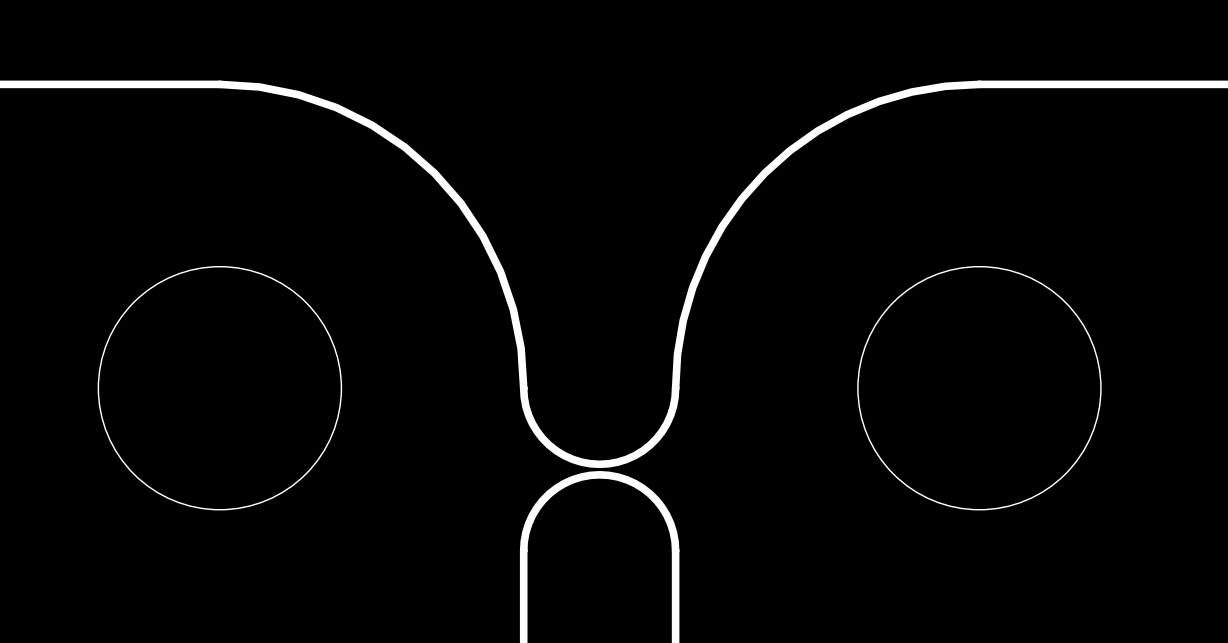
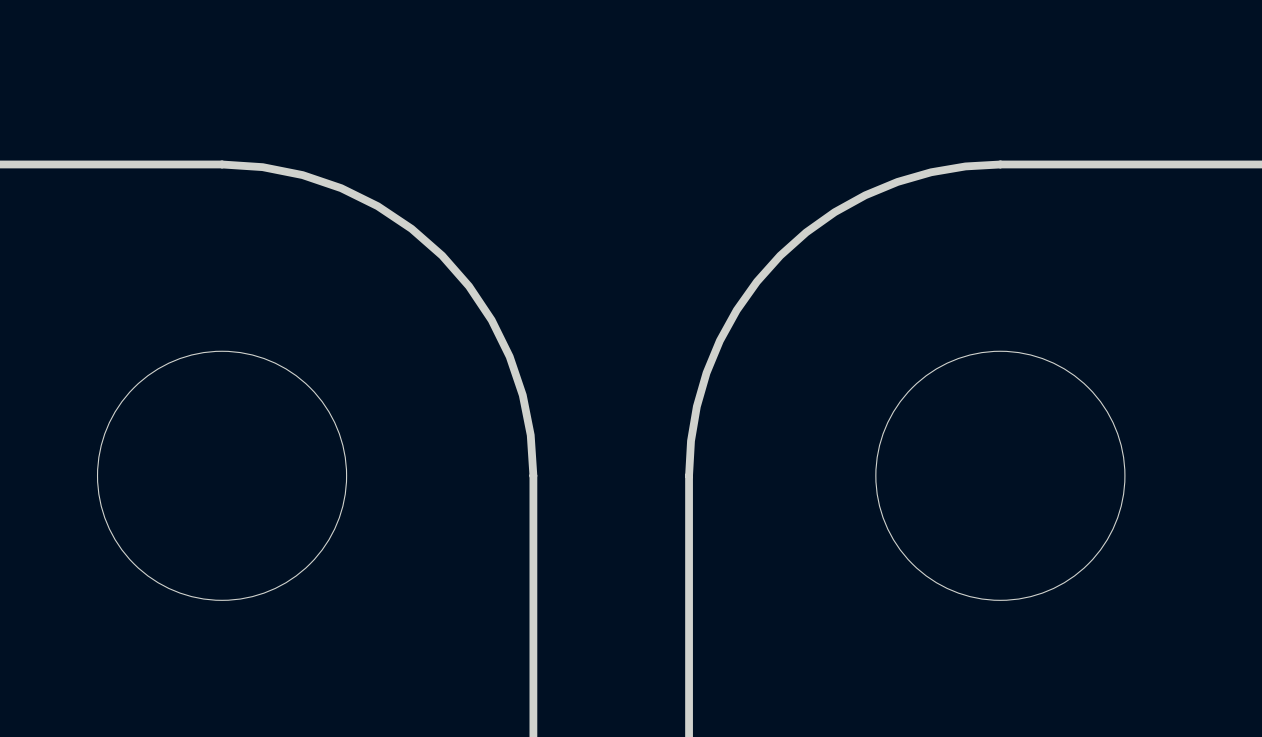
board edge: (523, 388) (525, 406) (532, 423) (549, 445) (572, 459) (599, 464) (626, 459) (650, 445) (662, 431) (670, 415) (675, 388) -> (533, 475) (533, 642)
board edge: (523, 550) (525, 532) (532, 515) (549, 493) (572, 479) (599, 474) (626, 479) (650, 493) (666, 515) (673, 532) (675, 550) -> (689, 475) (689, 642)

